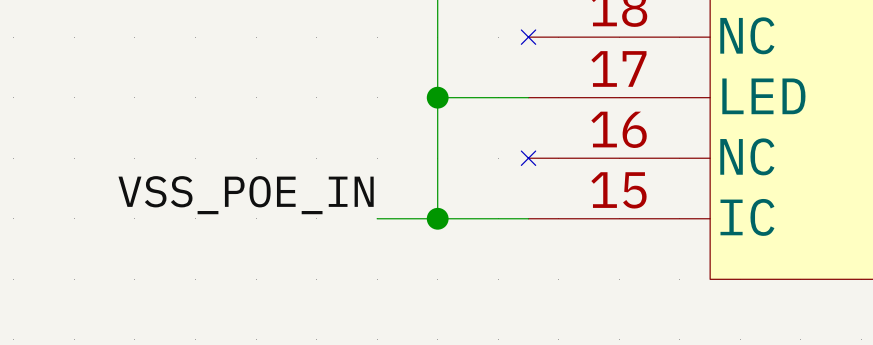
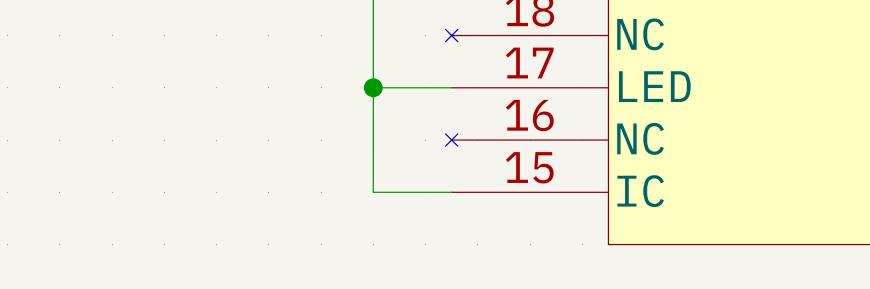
label: VSS_POE_IN (246, 195) -> none
wire: (377, 218) (437, 218) -> none
junction: (437, 218) -> none

